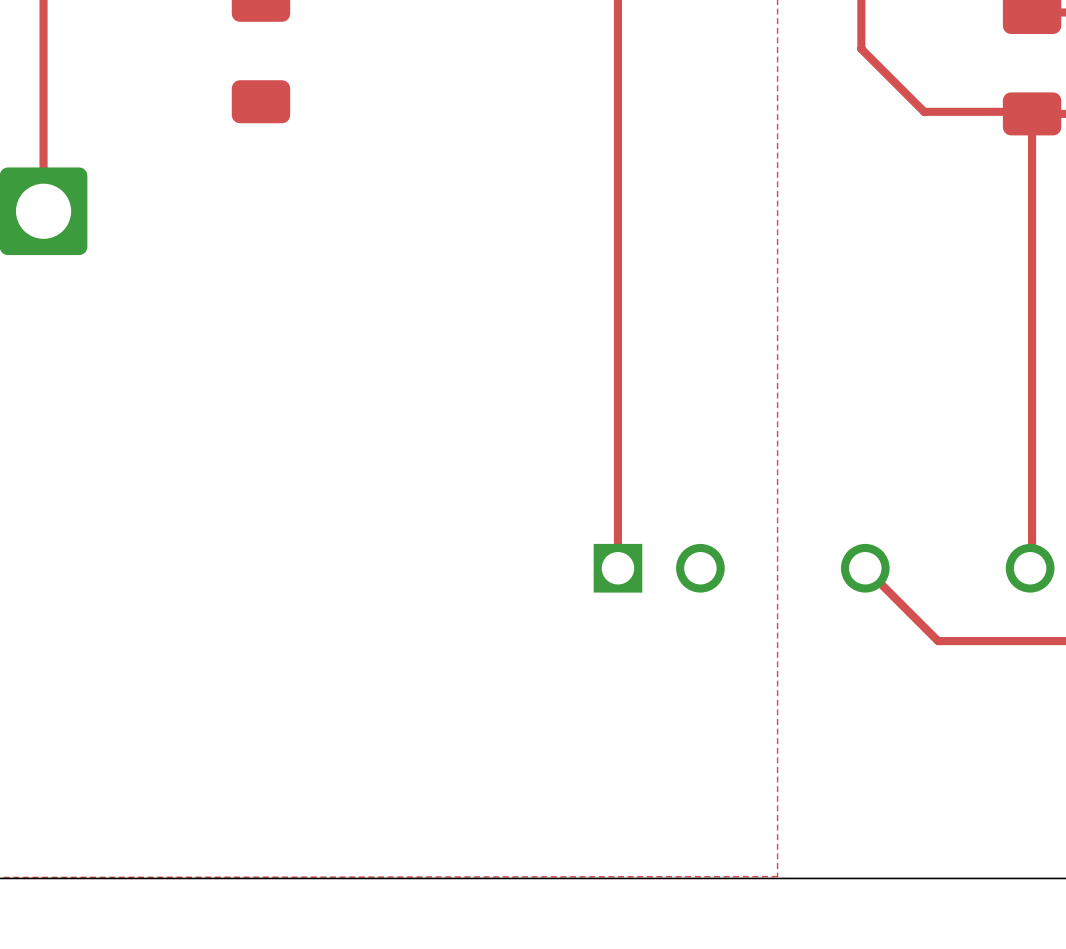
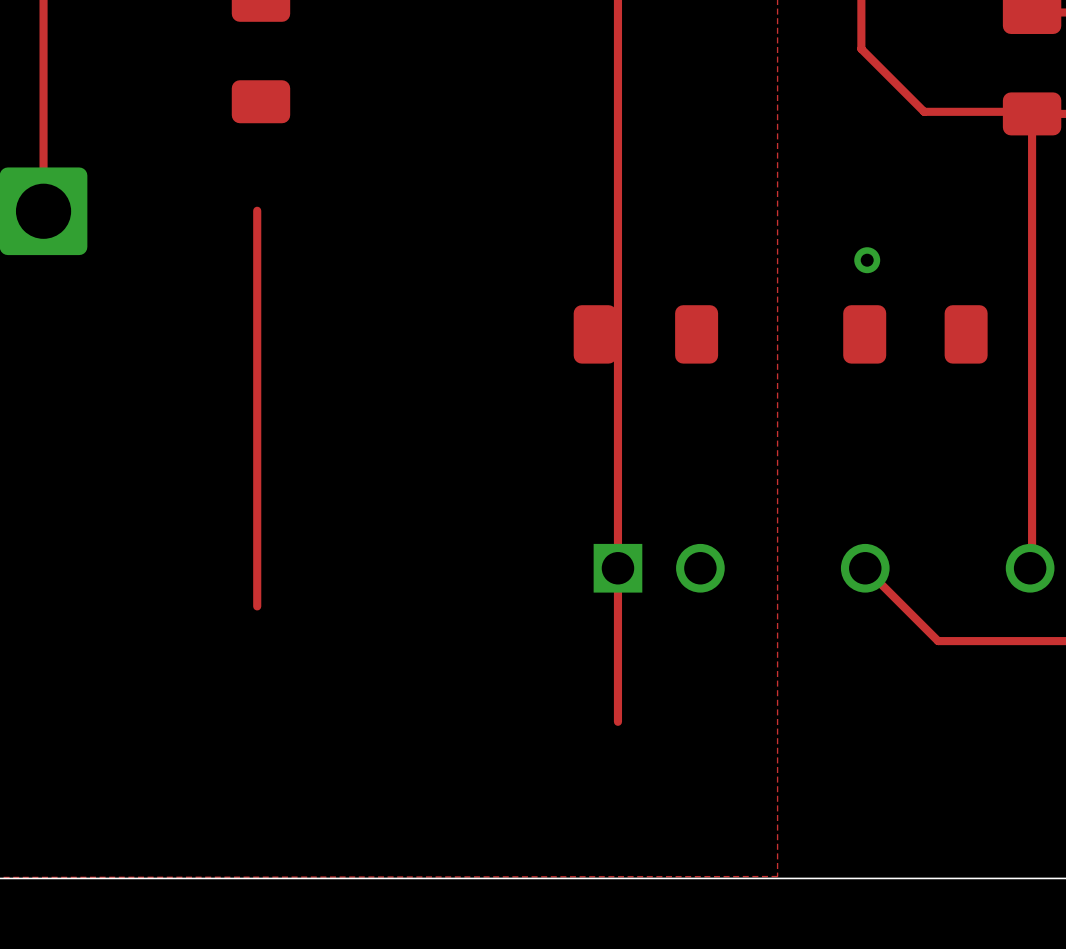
top track: none -> (257, 210) (257, 606)
via: none -> (867, 260)
part: none -> (645, 334)
part: none -> (915, 334)
top track: none -> (617, 568) (617, 721)

